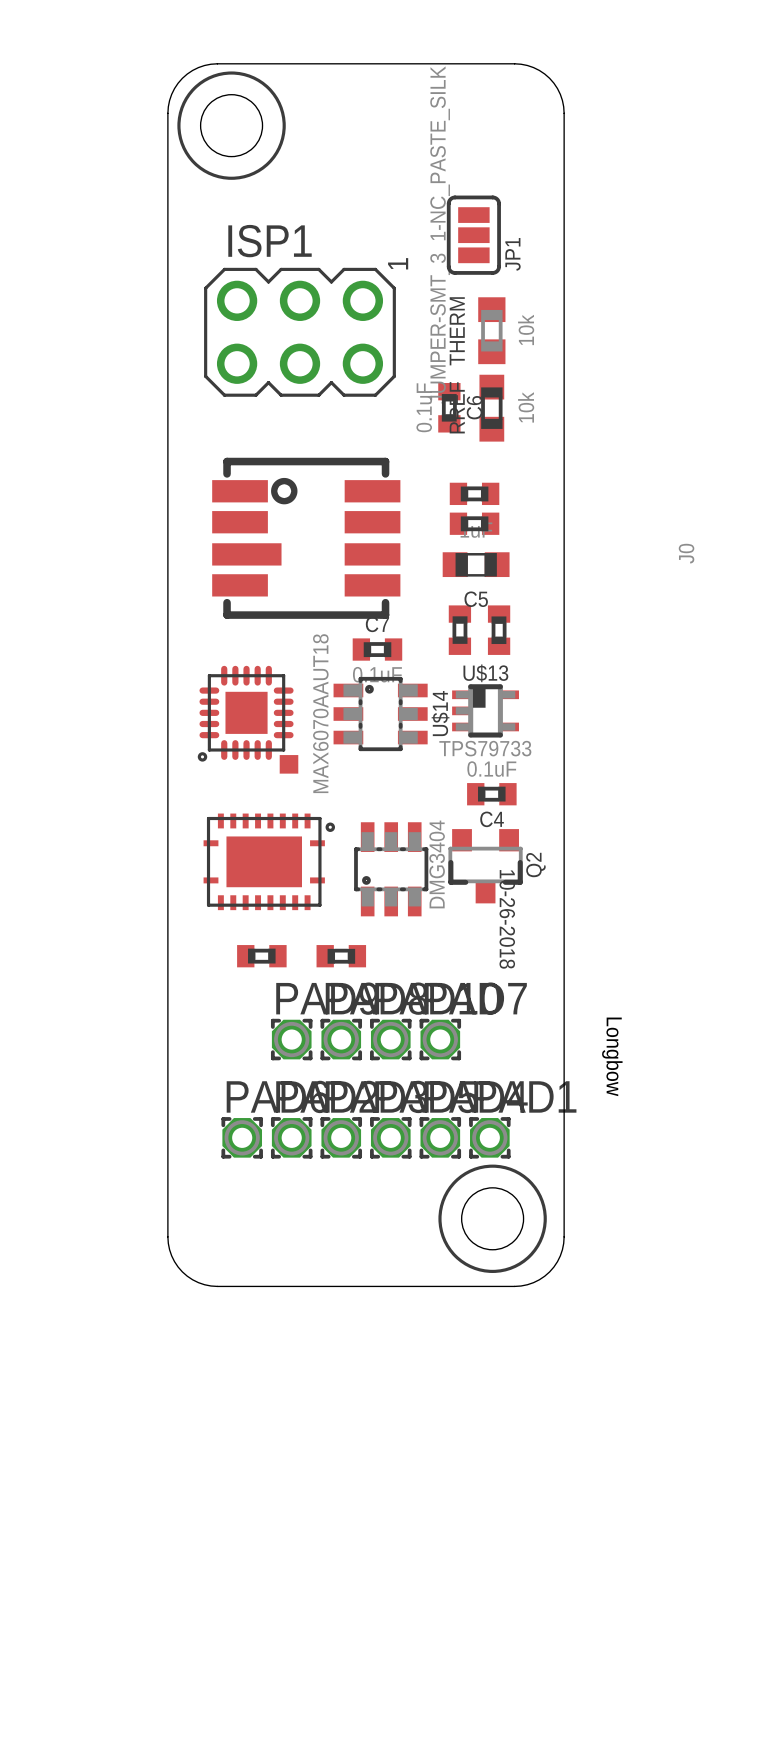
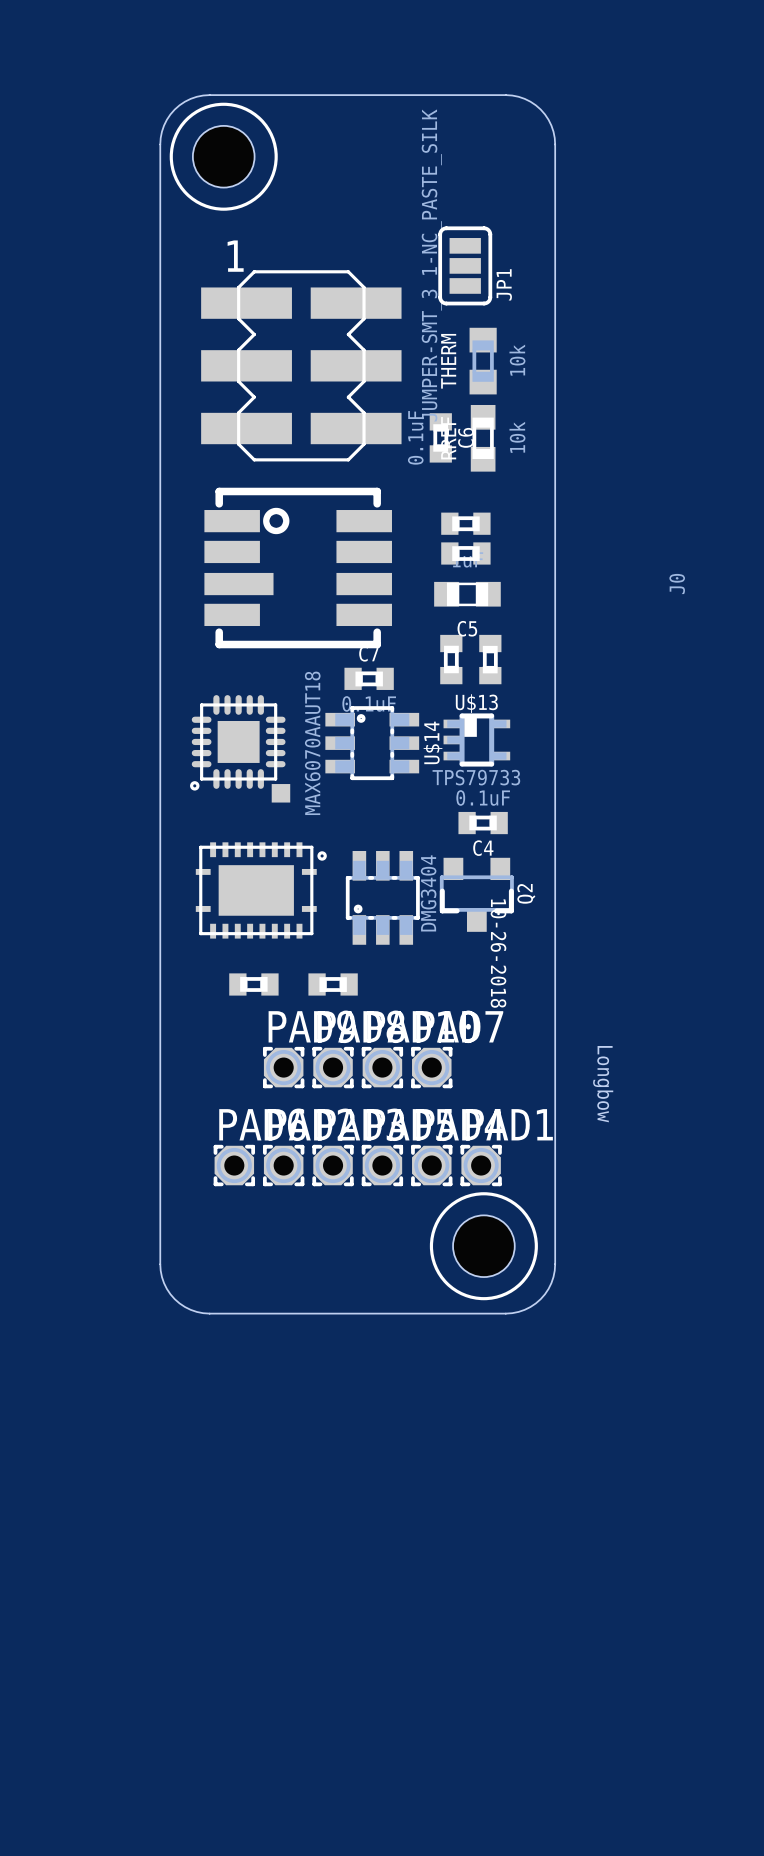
ISP1: (299, 332) -> none
part: none -> (301, 365)

